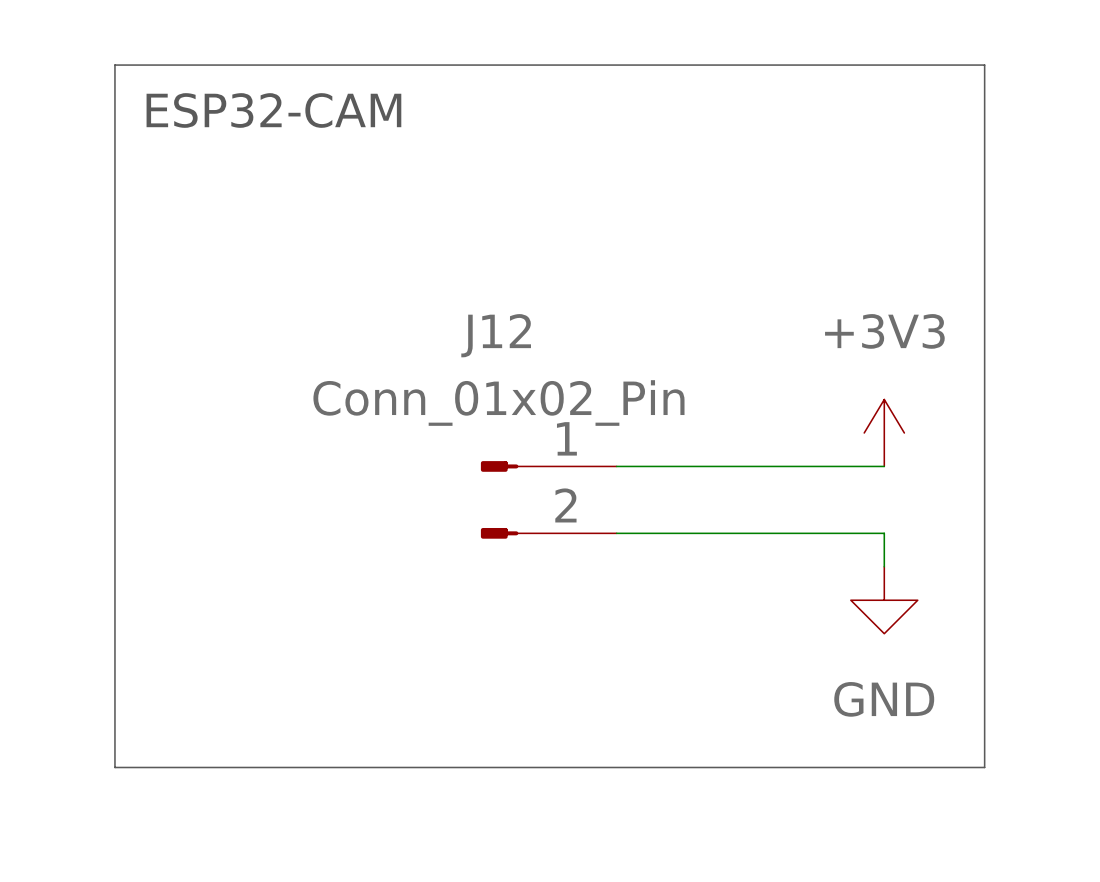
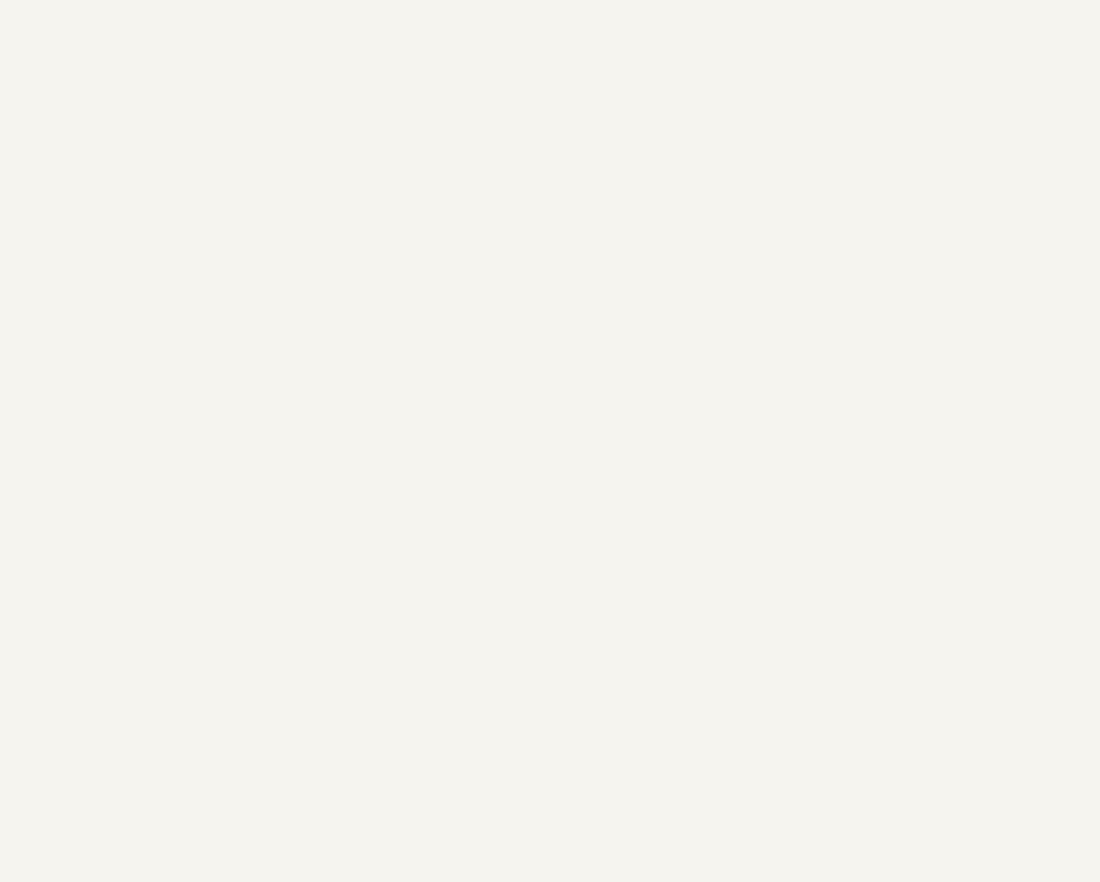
line: (114, 65) (984, 65) (984, 767) (114, 767) (114, 65) -> none
text: ESP32-CAM (273, 110) -> none
power symbol: +3V3 (884, 433) -> none
wire: (616, 466) (884, 466) -> none
J12: Conn_01x02_Pin (548, 499) -> none
wire: (616, 533) (884, 533) (884, 566) -> none
power symbol: GND (884, 600) -> none

